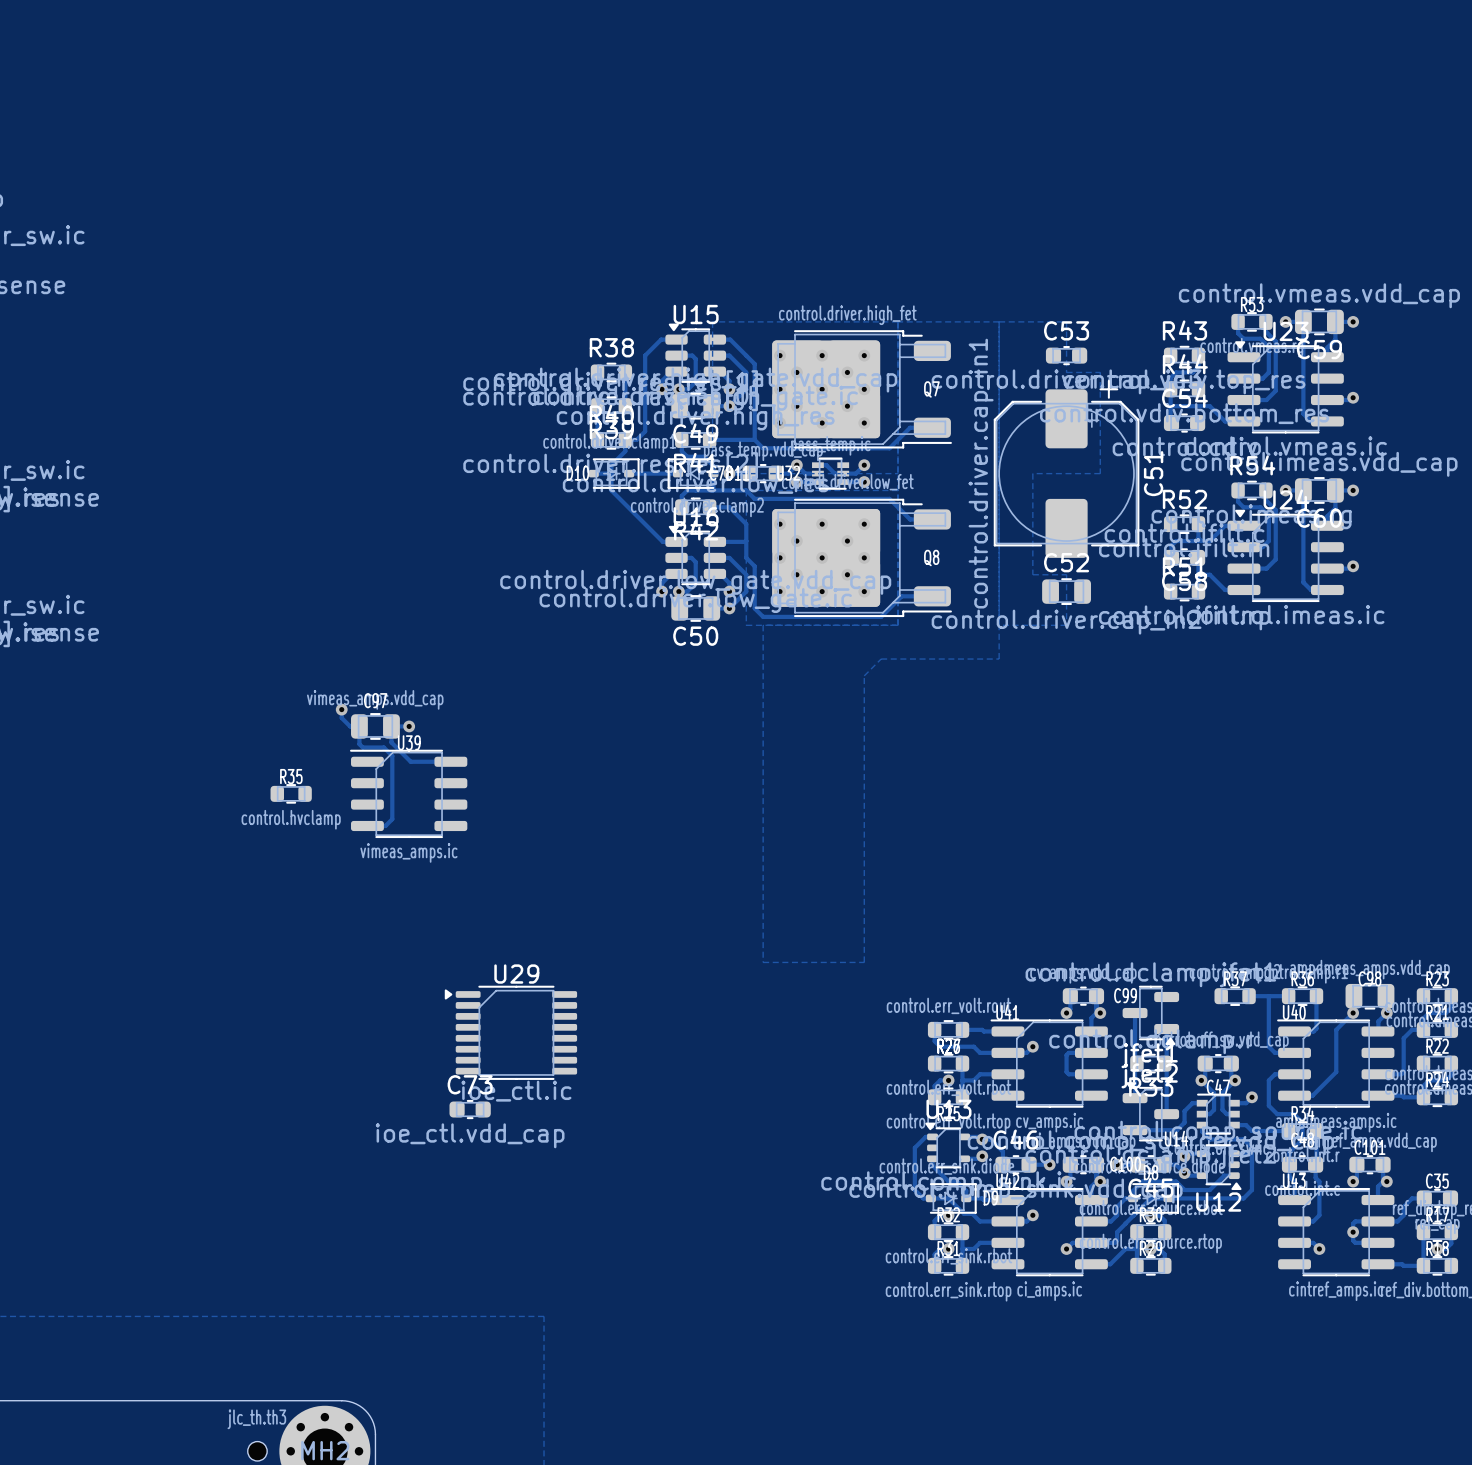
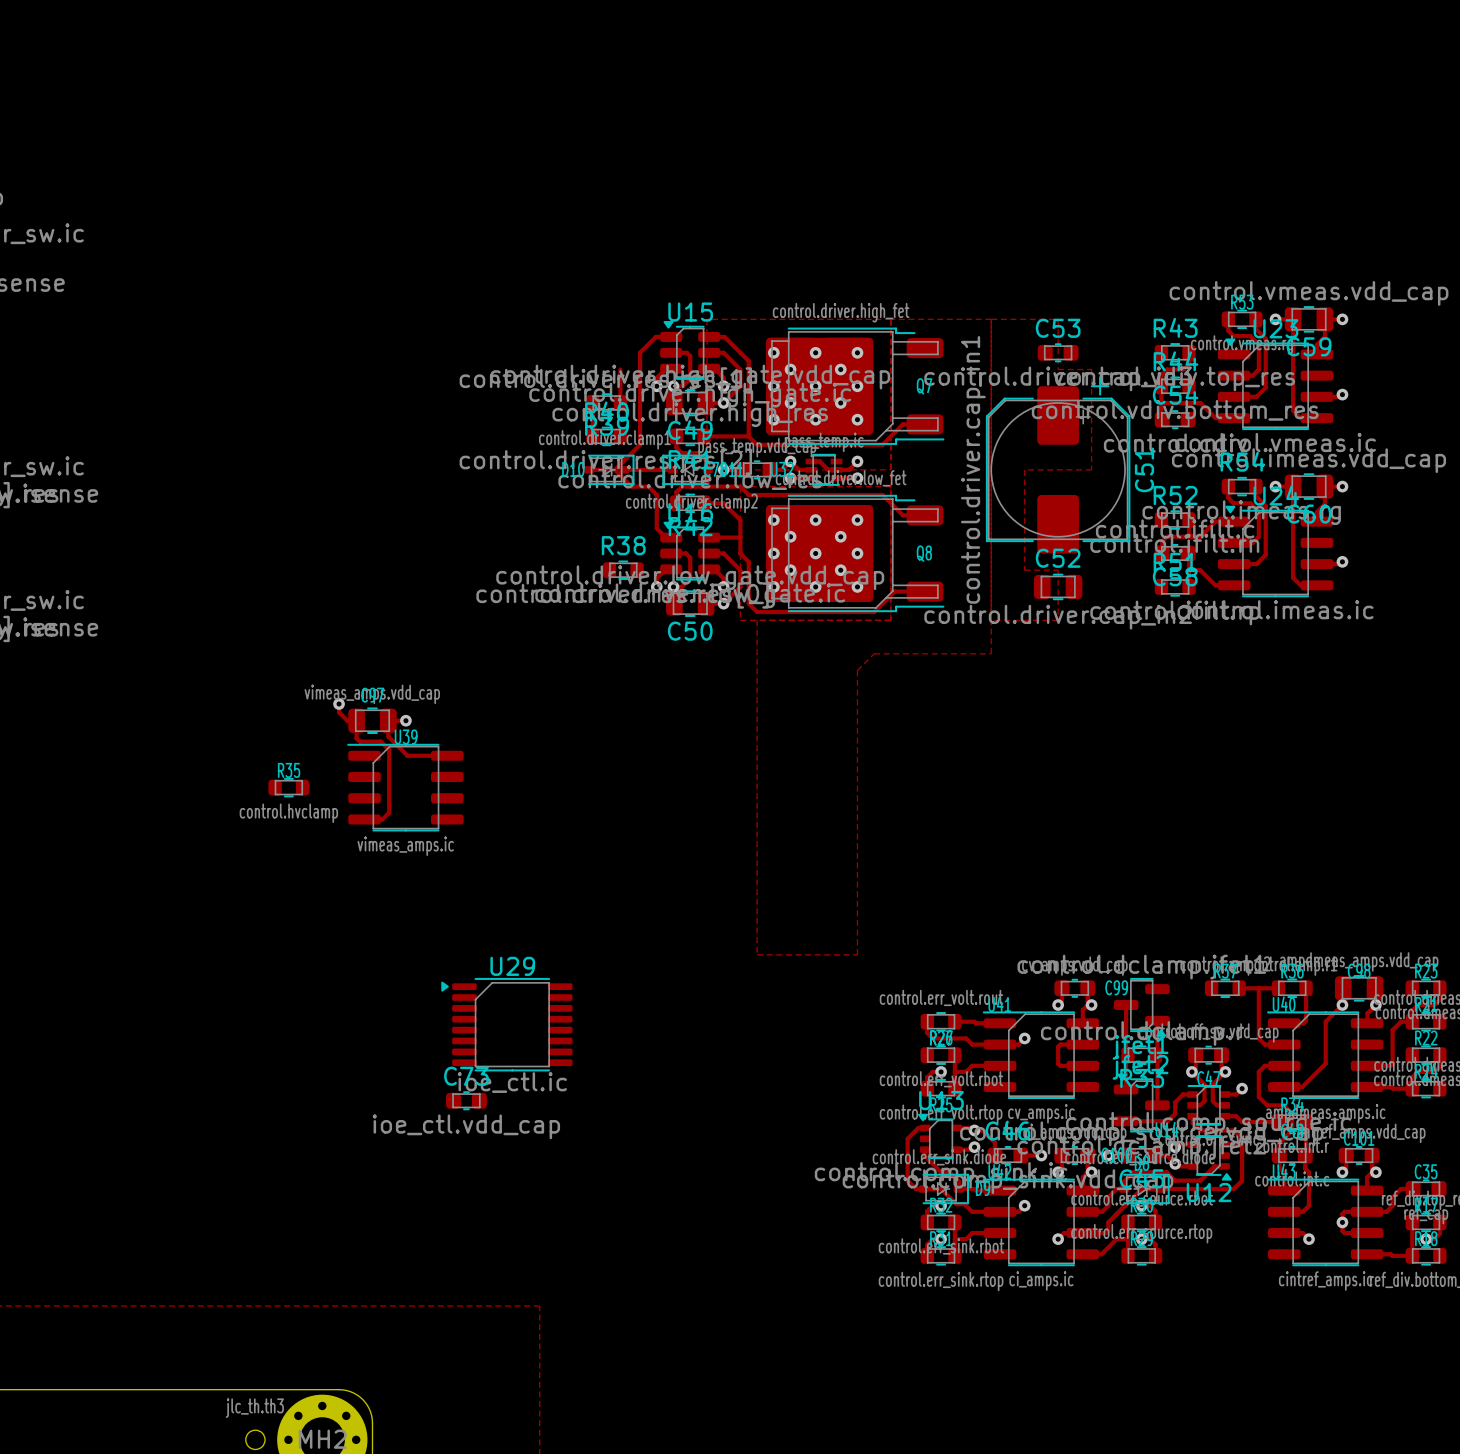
R38 position: (611, 372) -> (623, 570)
track: (645, 431) (636, 439) (625, 439) (625, 451) (611, 465) (611, 490) (662, 541) (671, 541) -> (640, 428) (640, 444) (614, 469) (631, 486) (648, 486) (656, 494) (656, 528) (665, 537)

